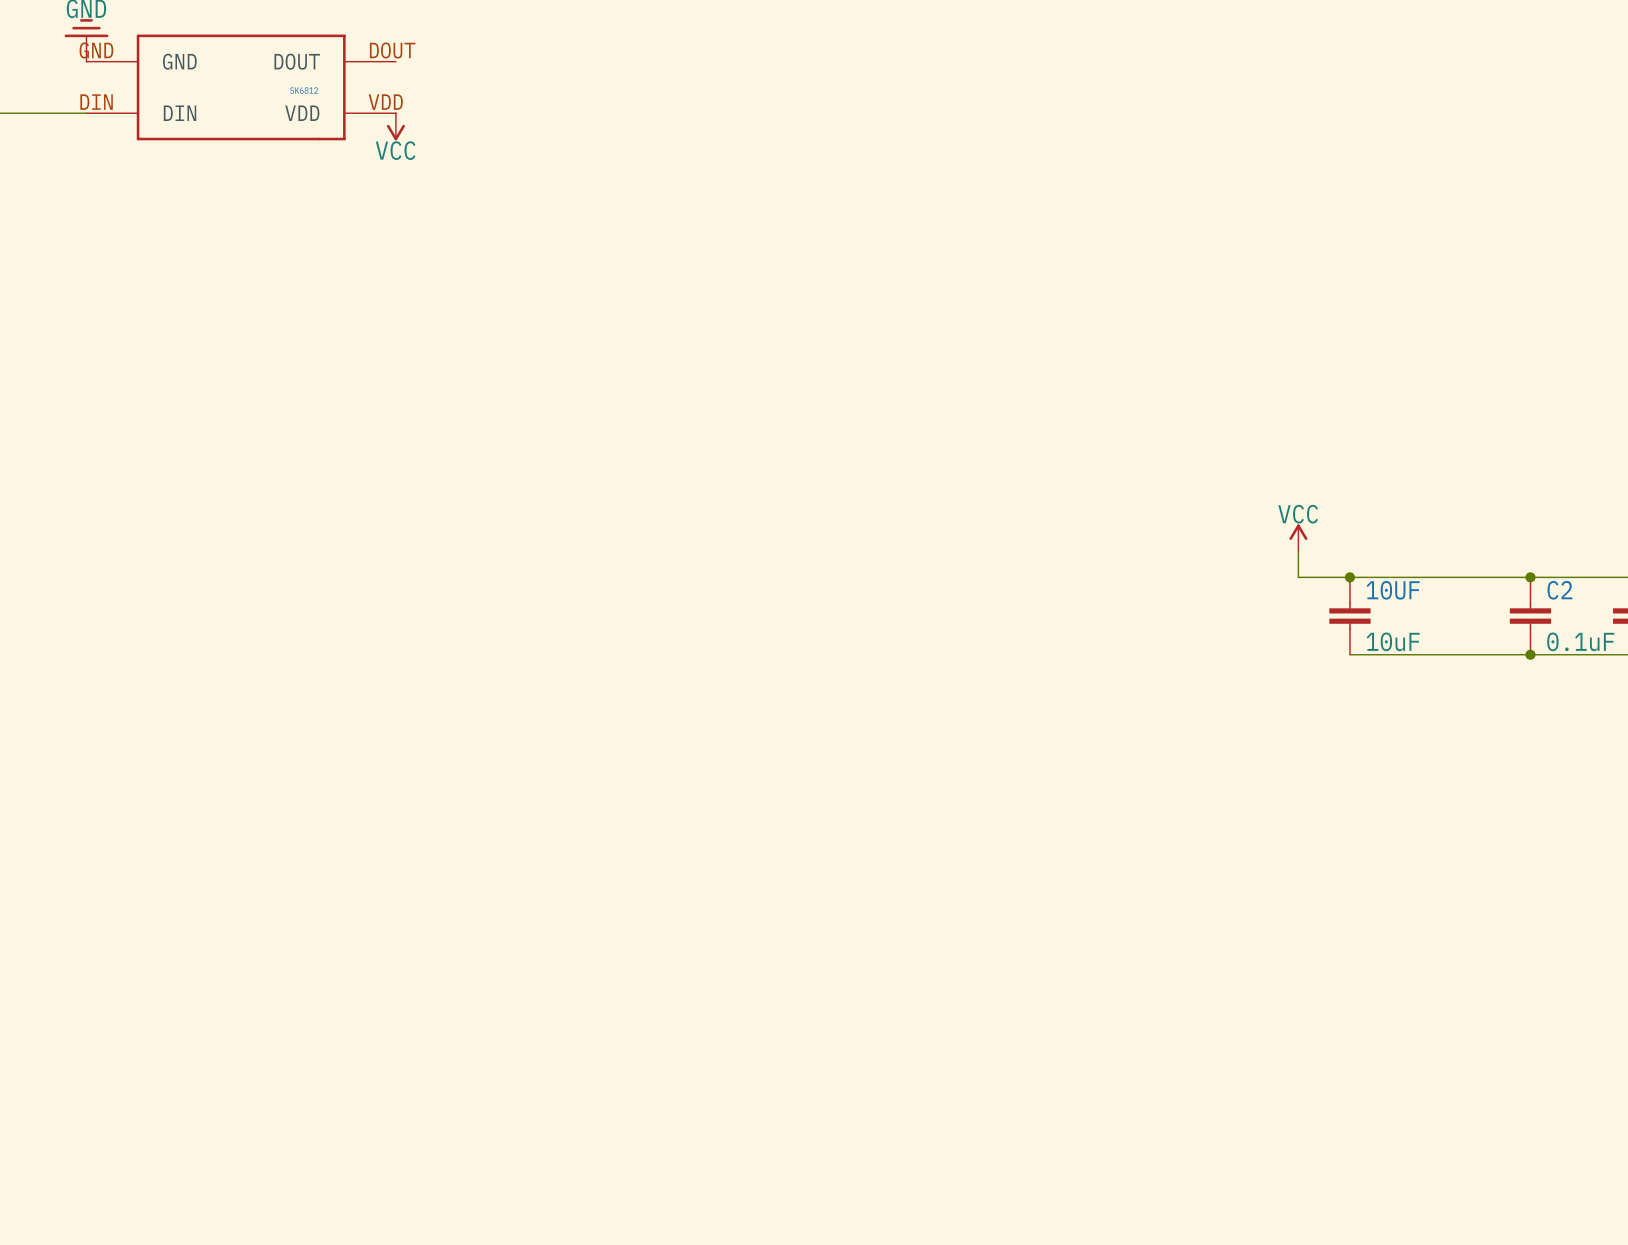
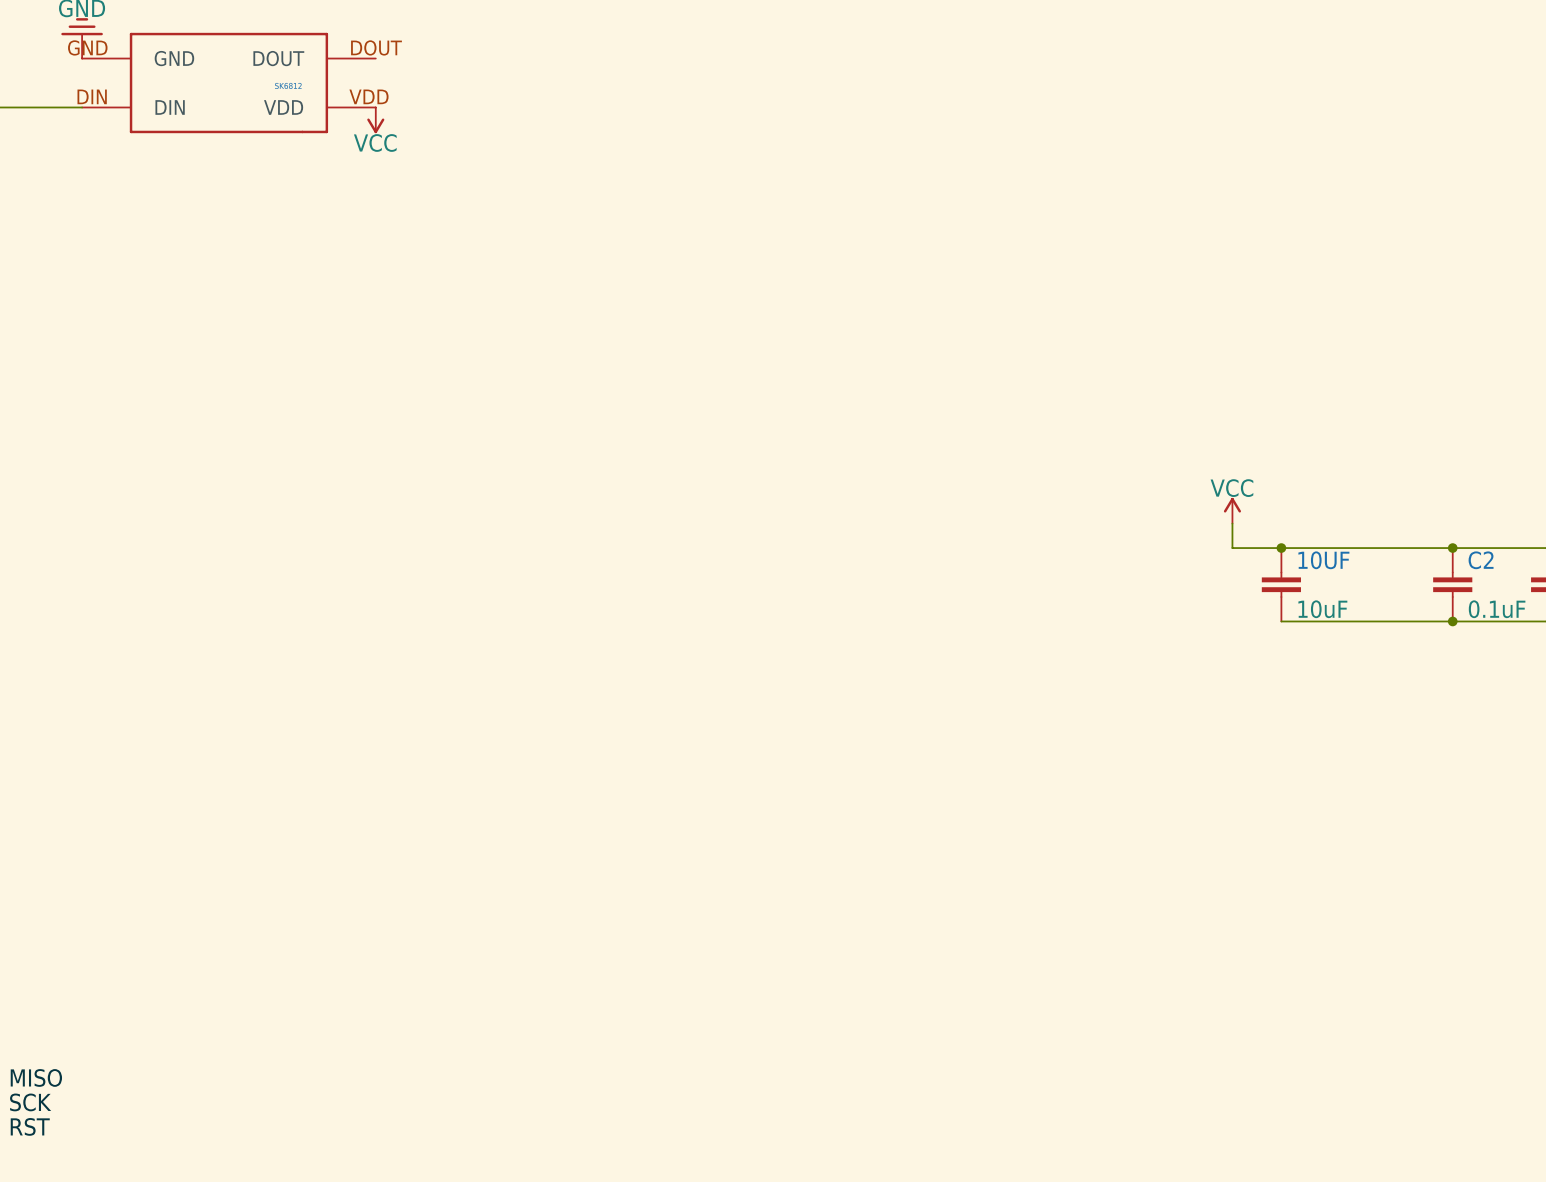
label: none -> MISO (36, 1077)
label: none -> SCK (30, 1102)
label: none -> RST (30, 1126)

